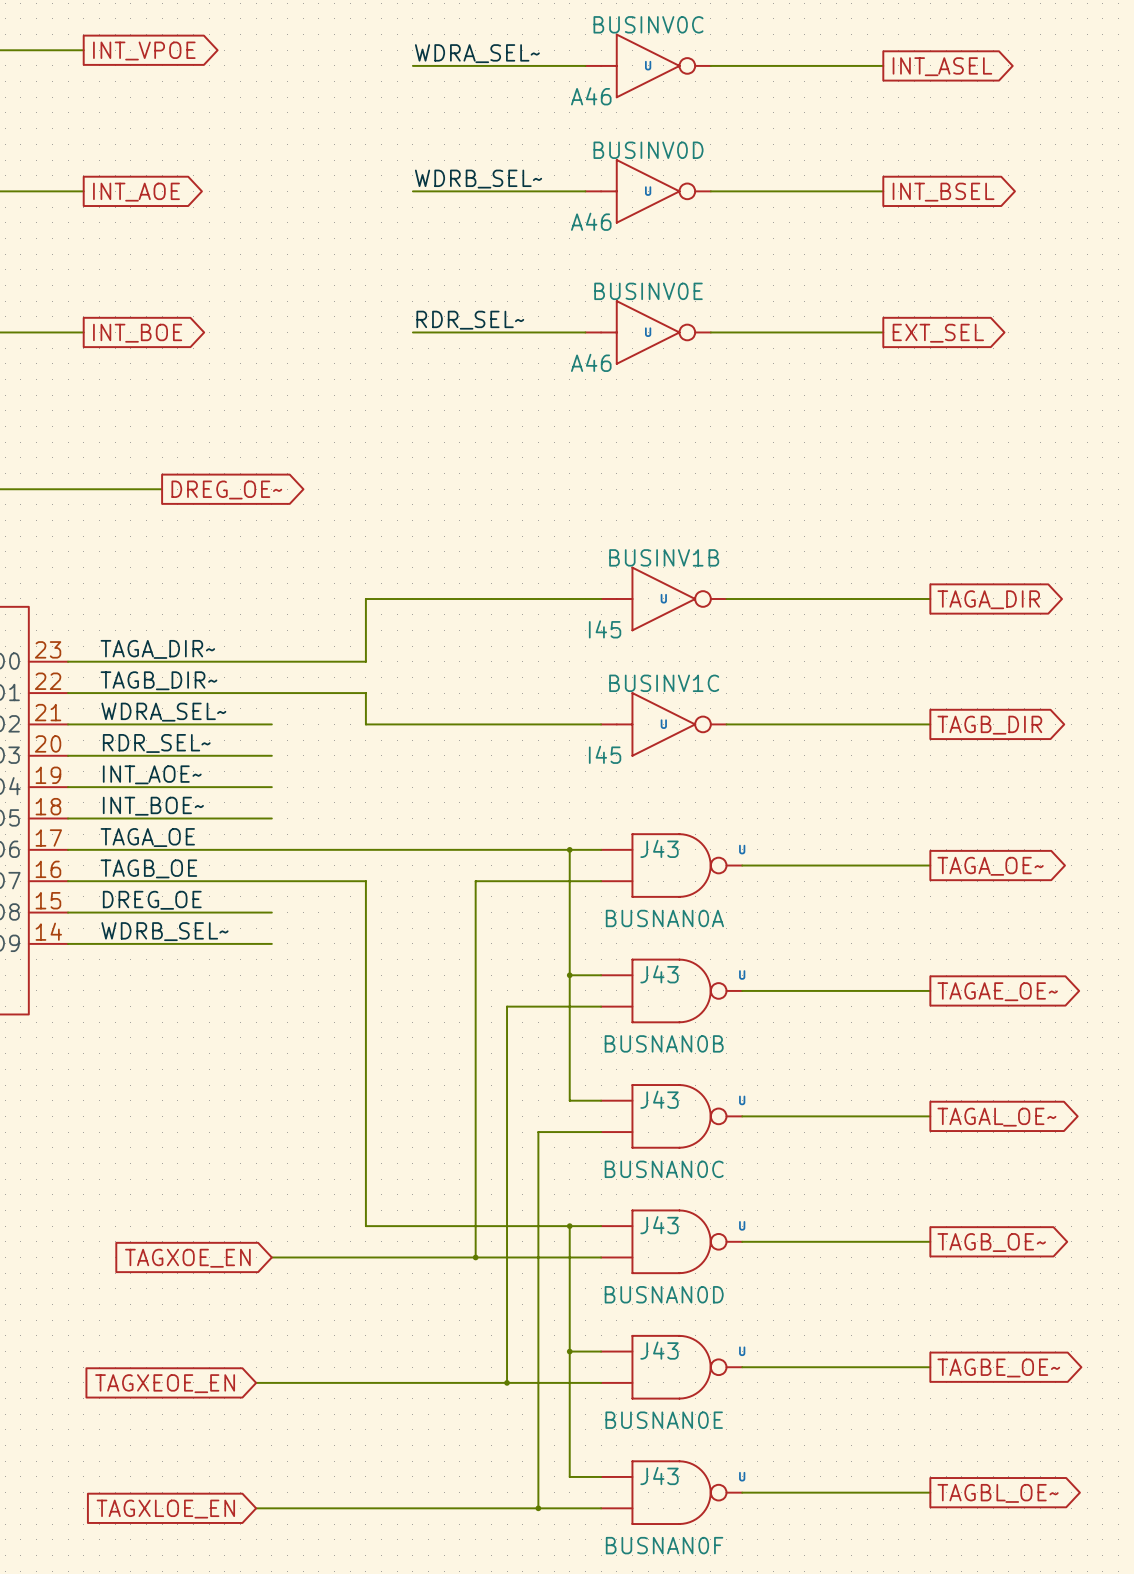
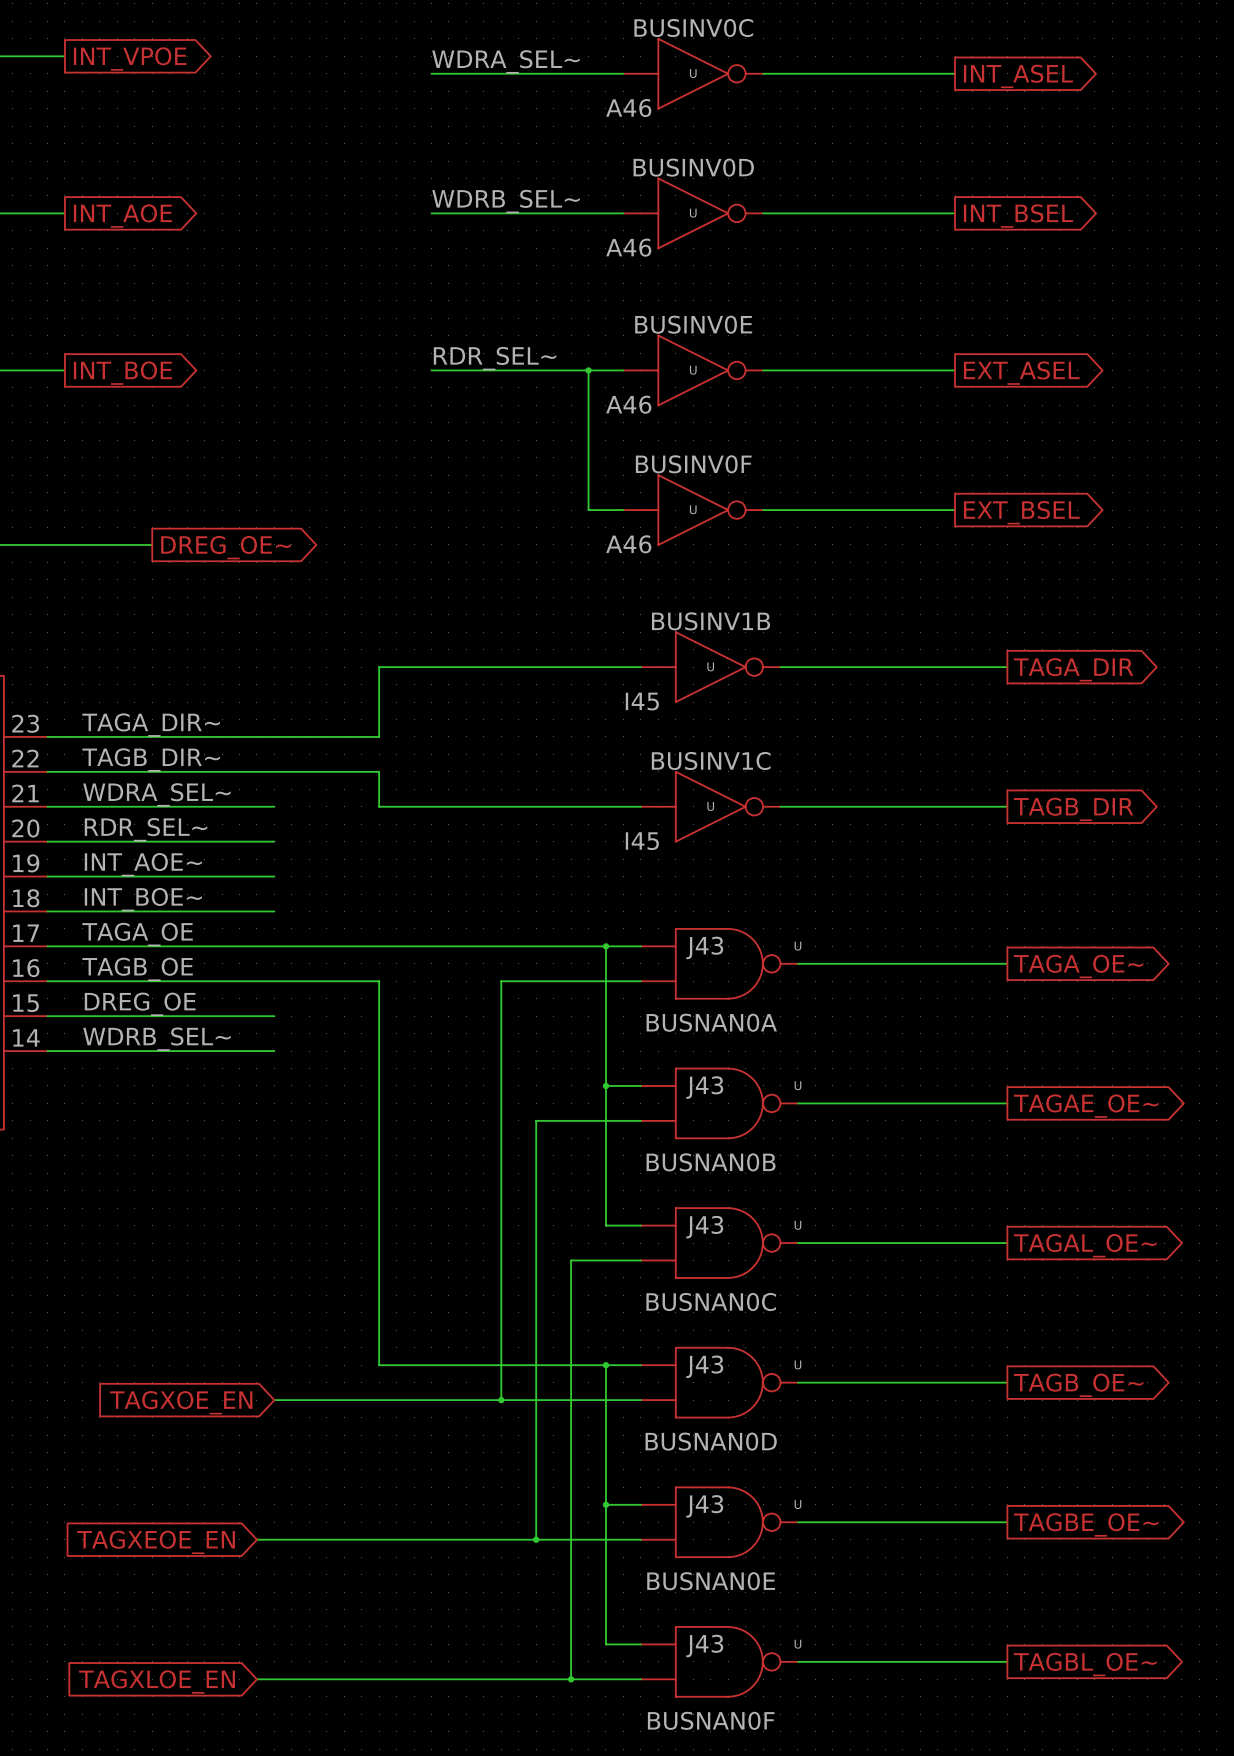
wire: none -> (588, 370) (588, 510) (623, 510)
junction: none -> (588, 370)
global label: EXT_SEL (938, 333) -> EXT_ASEL (1021, 373)
U: none -> (693, 510)
wire: none -> (763, 510) (955, 510)
global label: none -> EXT_BSEL (1021, 512)

